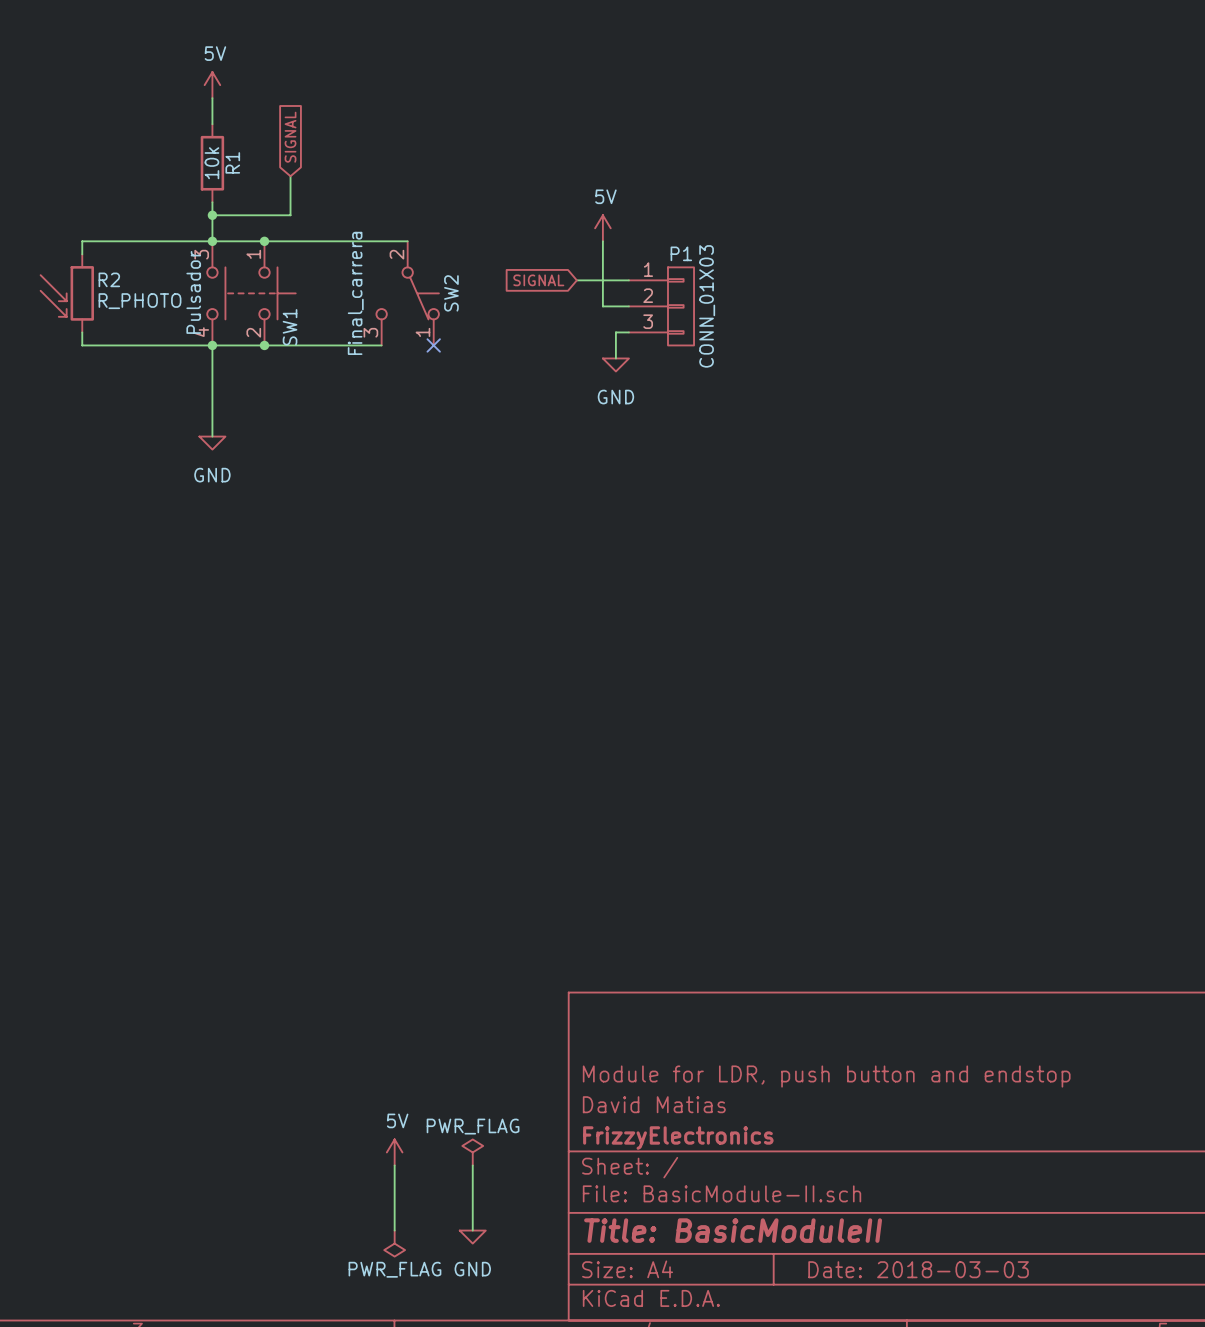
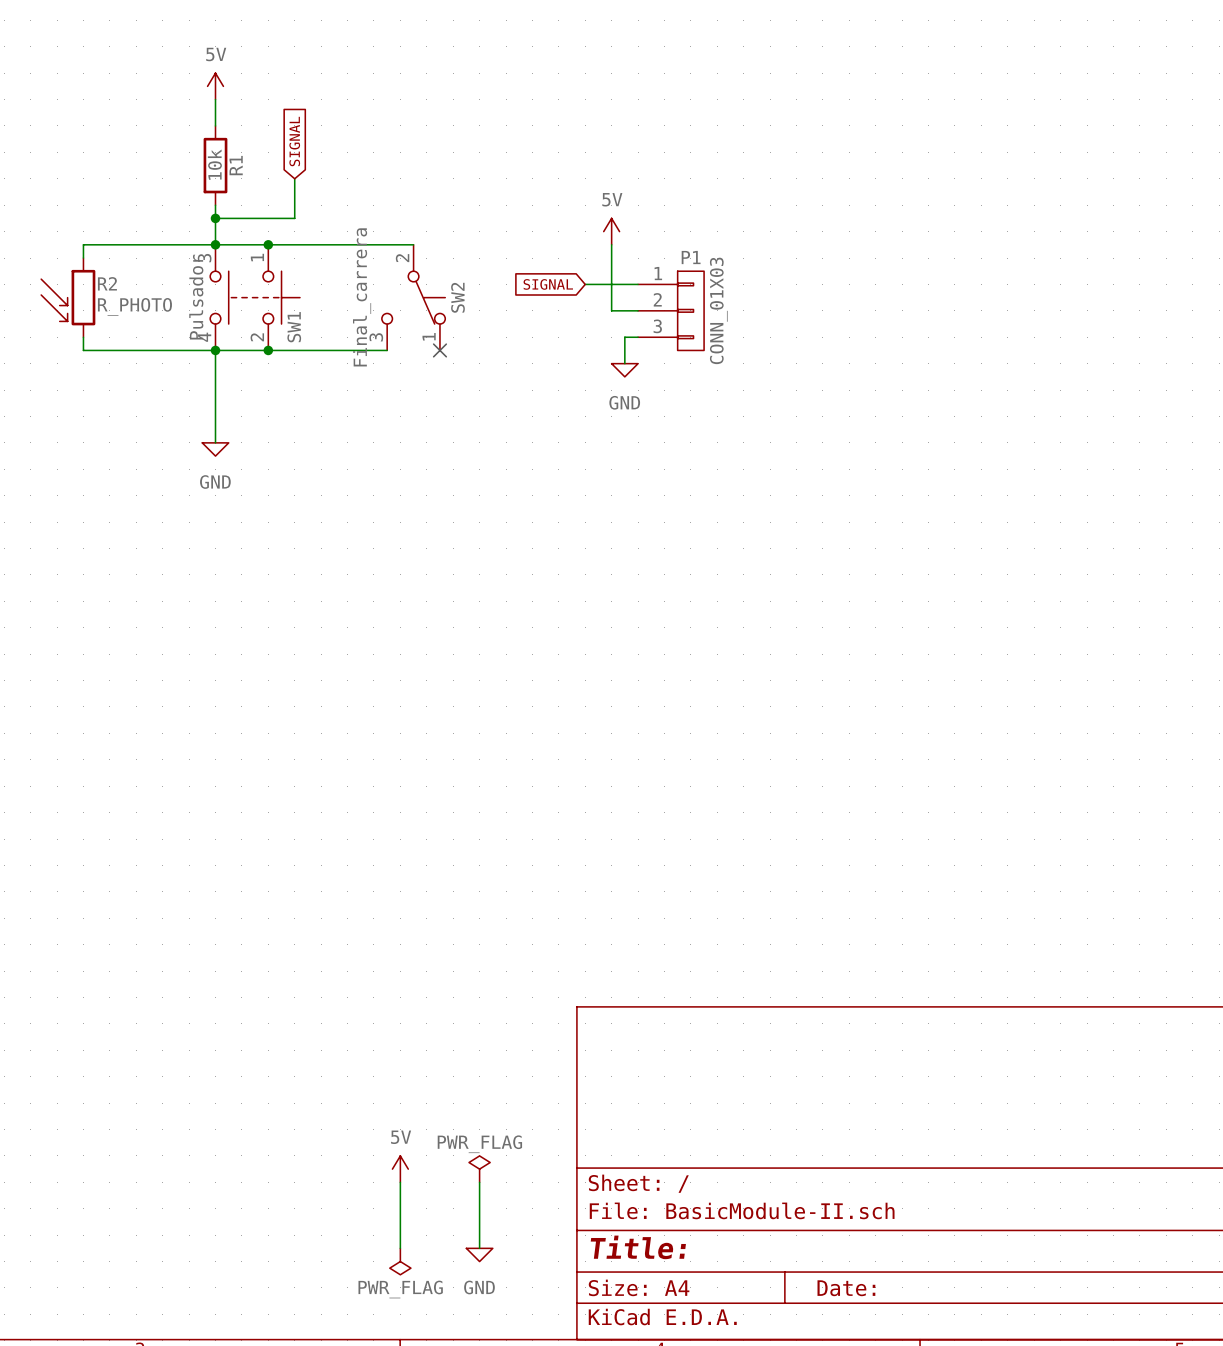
title block: Module for LDR, push button and endstop (826, 1076) -> none
title block: David Matias (654, 1104) -> none
title block: FrizzyElectronics (678, 1138) -> none
title block: Title: BasicModuleII (733, 1230) -> Title: (638, 1247)
title block: Date: 2018-03-03 (918, 1269) -> Date: (846, 1288)

